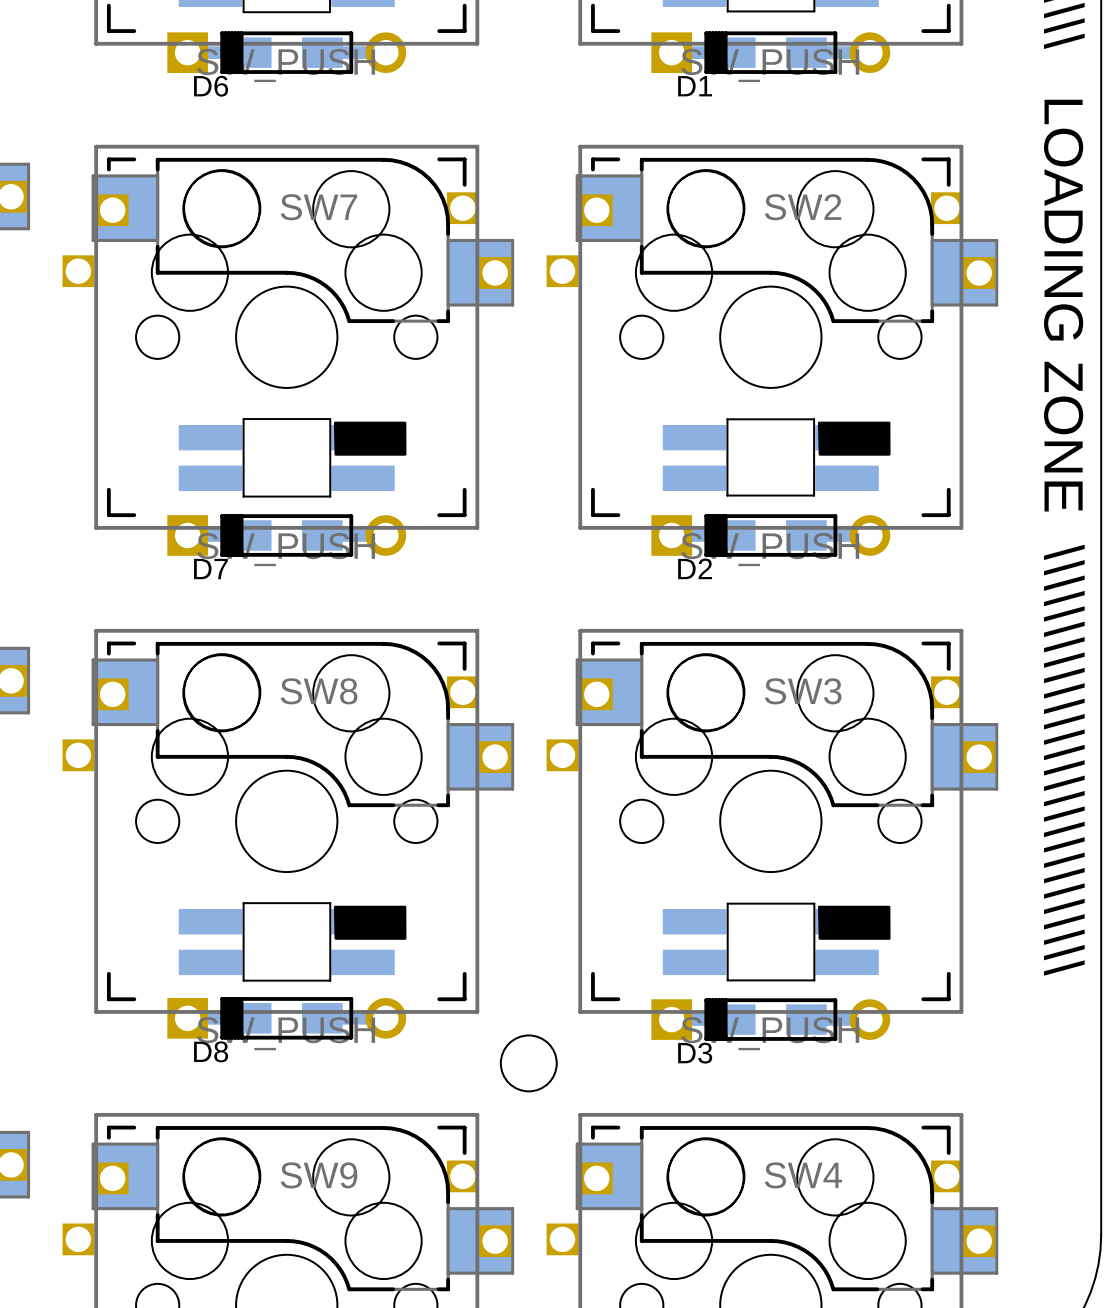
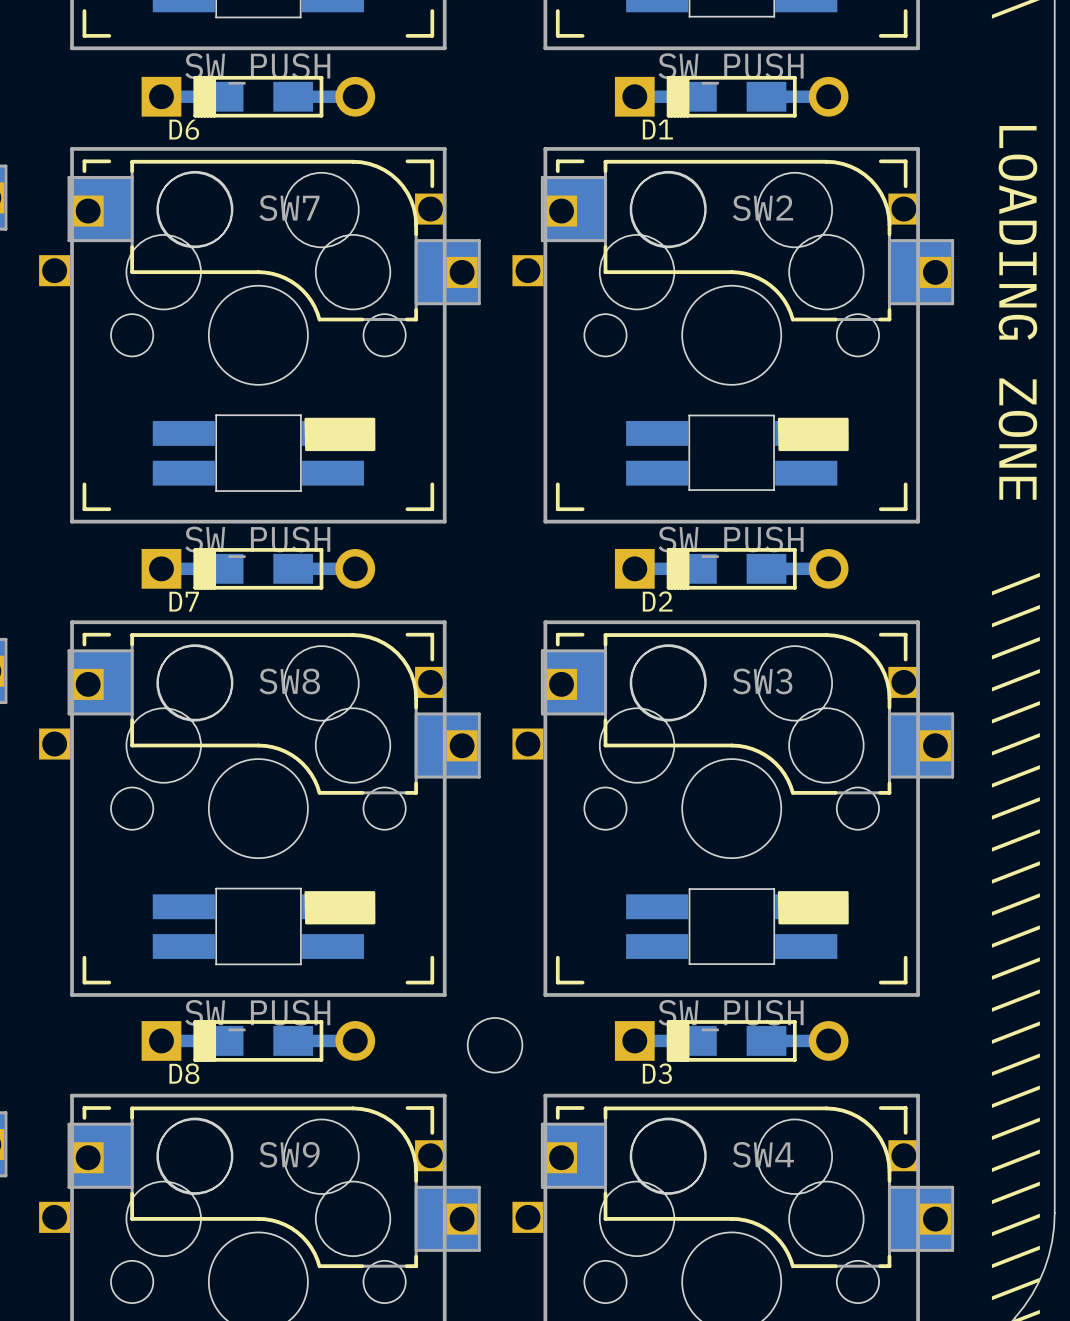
D6 position: (286, 52) -> (258, 96)
D1 position: (770, 52) -> (731, 96)
D7 position: (286, 535) -> (258, 568)
D2 position: (770, 535) -> (731, 568)
D8 position: (286, 1018) -> (258, 1040)
D3 position: (770, 1019) -> (731, 1040)

